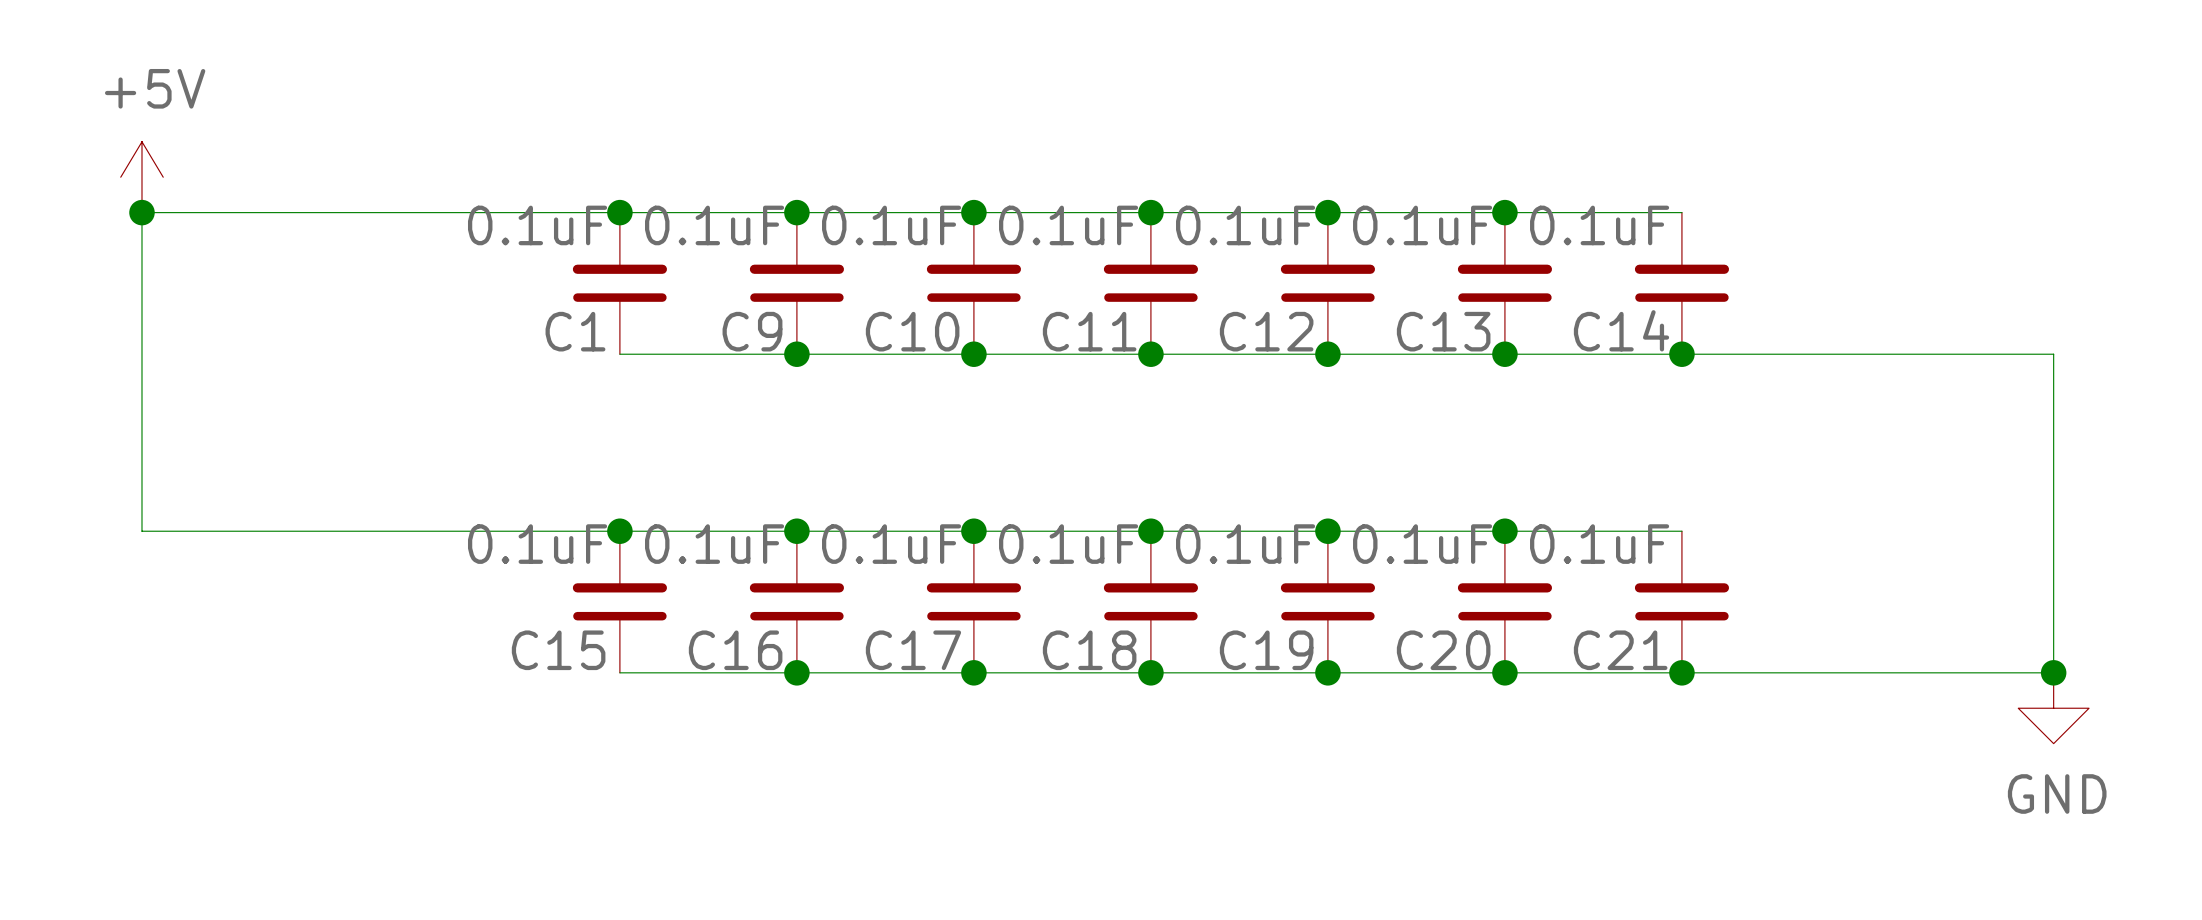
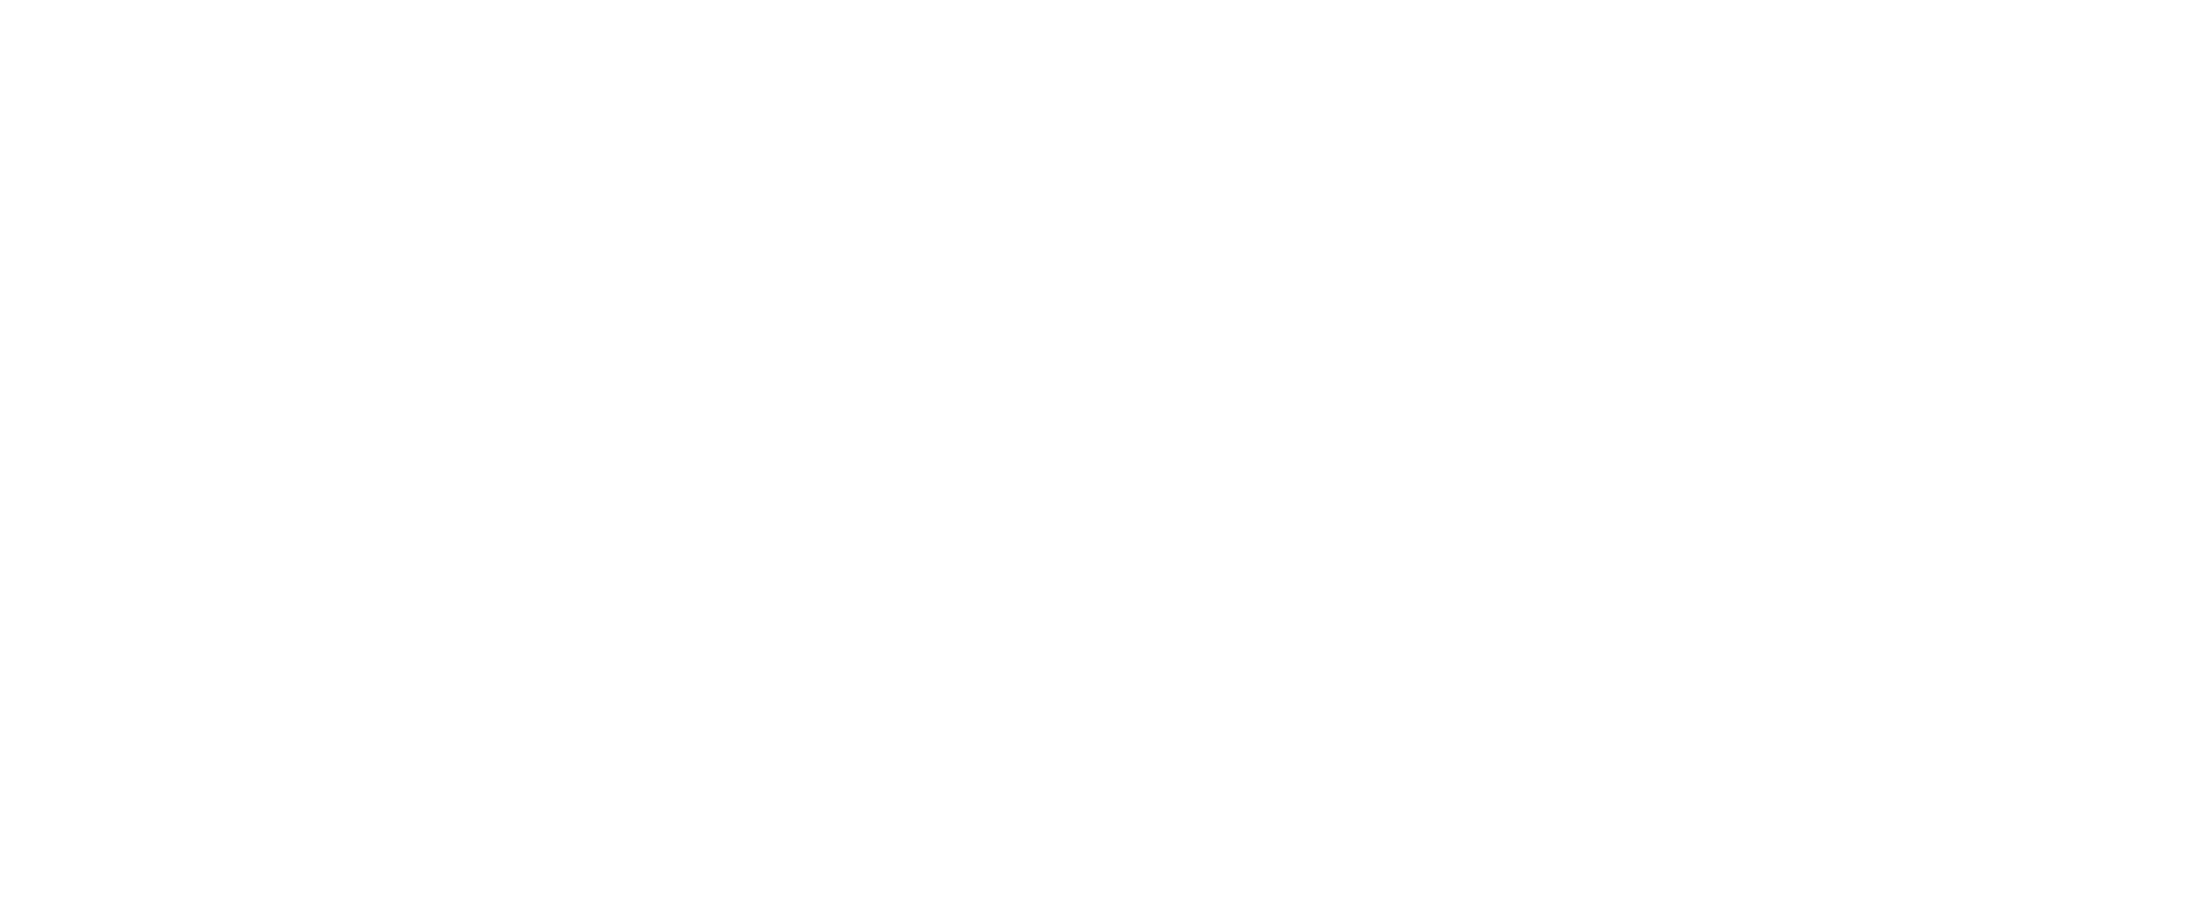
power symbol: +5V (141, 177) -> none
junction: (141, 212) -> none
junction: (619, 212) -> none
junction: (796, 212) -> none
junction: (973, 212) -> none
junction: (1150, 212) -> none
junction: (1327, 212) -> none
junction: (1504, 212) -> none
wire: (1681, 212) (141, 212) (141, 531) (1681, 531) -> none
C1: 0.1uF (619, 283) -> none
C9: 0.1uF (796, 283) -> none
C10: 0.1uF (973, 283) -> none
C11: 0.1uF (1150, 283) -> none
C12: 0.1uF (1327, 283) -> none
C13: 0.1uF (1504, 283) -> none
C14: 0.1uF (1681, 283) -> none
wire: (619, 354) (2053, 354) (2053, 672) (619, 672) -> none
junction: (796, 354) -> none
junction: (973, 354) -> none
junction: (1150, 354) -> none
junction: (1327, 354) -> none
junction: (1504, 354) -> none
junction: (1681, 354) -> none
junction: (619, 531) -> none
junction: (796, 531) -> none
junction: (973, 531) -> none
junction: (1150, 531) -> none
junction: (1327, 531) -> none
junction: (1504, 531) -> none
C15: 0.1uF (619, 602) -> none
C16: 0.1uF (796, 602) -> none
C17: 0.1uF (973, 602) -> none
C18: 0.1uF (1150, 602) -> none
C19: 0.1uF (1327, 602) -> none
C20: 0.1uF (1504, 602) -> none
C21: 0.1uF (1681, 602) -> none
junction: (796, 672) -> none
junction: (973, 672) -> none
junction: (1150, 672) -> none
junction: (1327, 672) -> none
junction: (1504, 672) -> none
junction: (1681, 672) -> none
junction: (2053, 672) -> none
power symbol: GND (2053, 708) -> none

